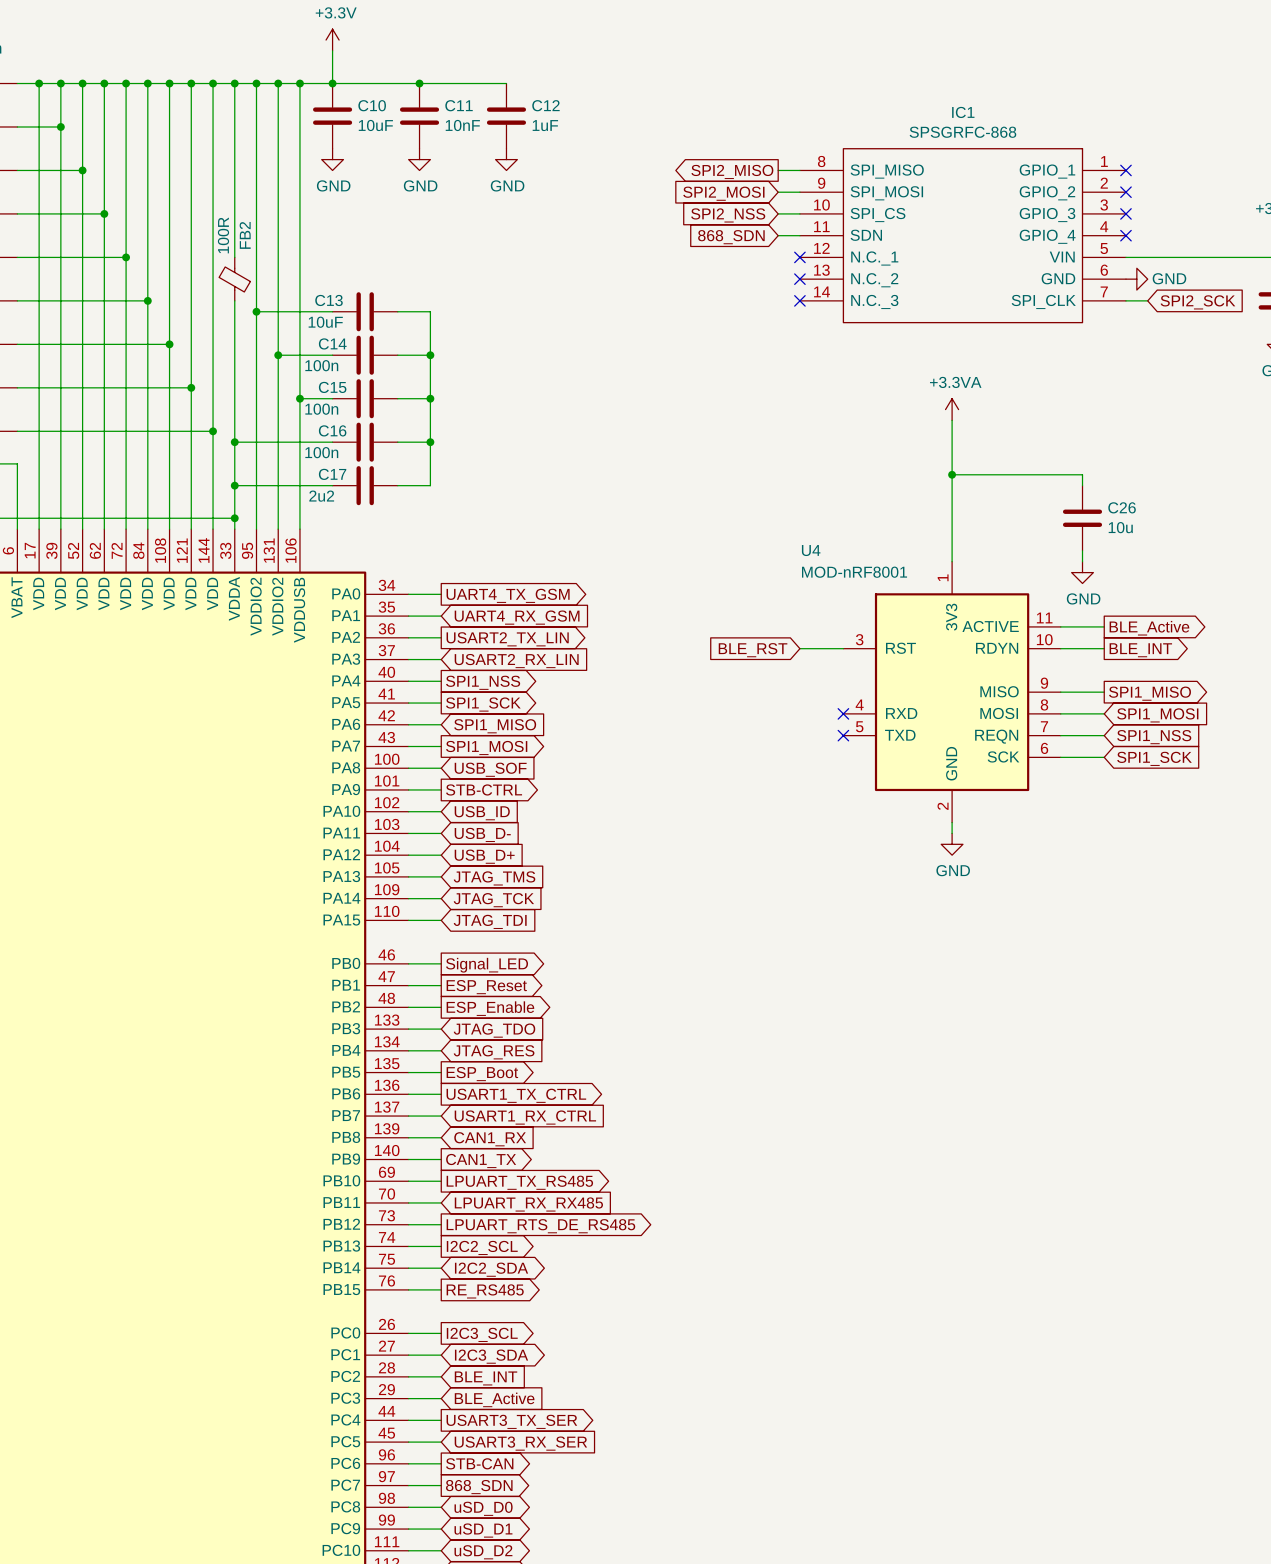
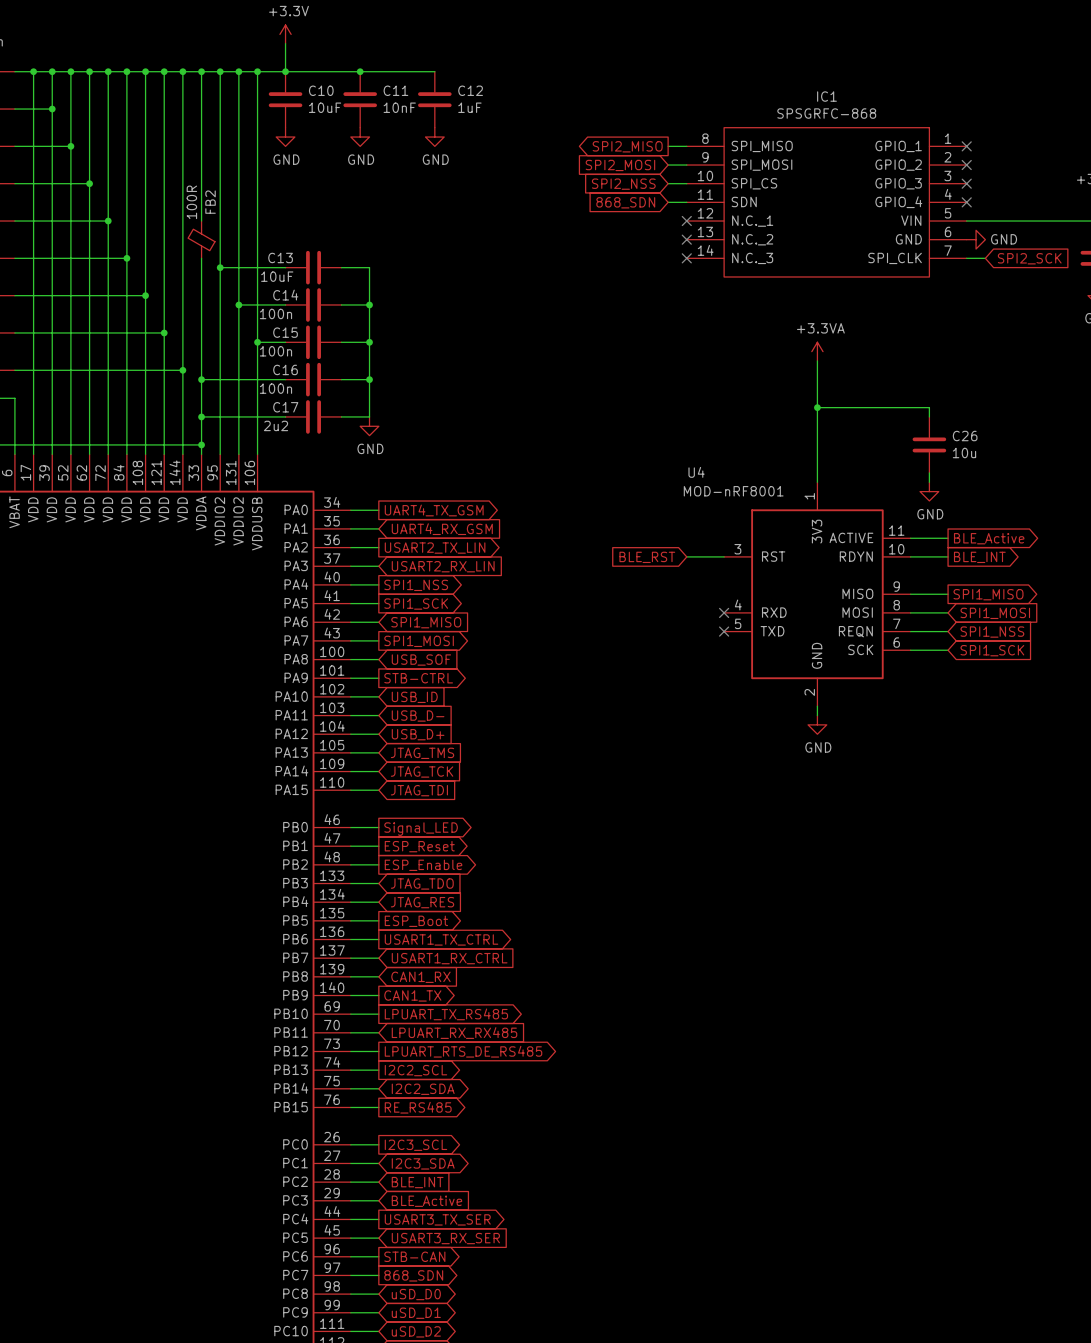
power symbol: none -> GND (369, 426)

